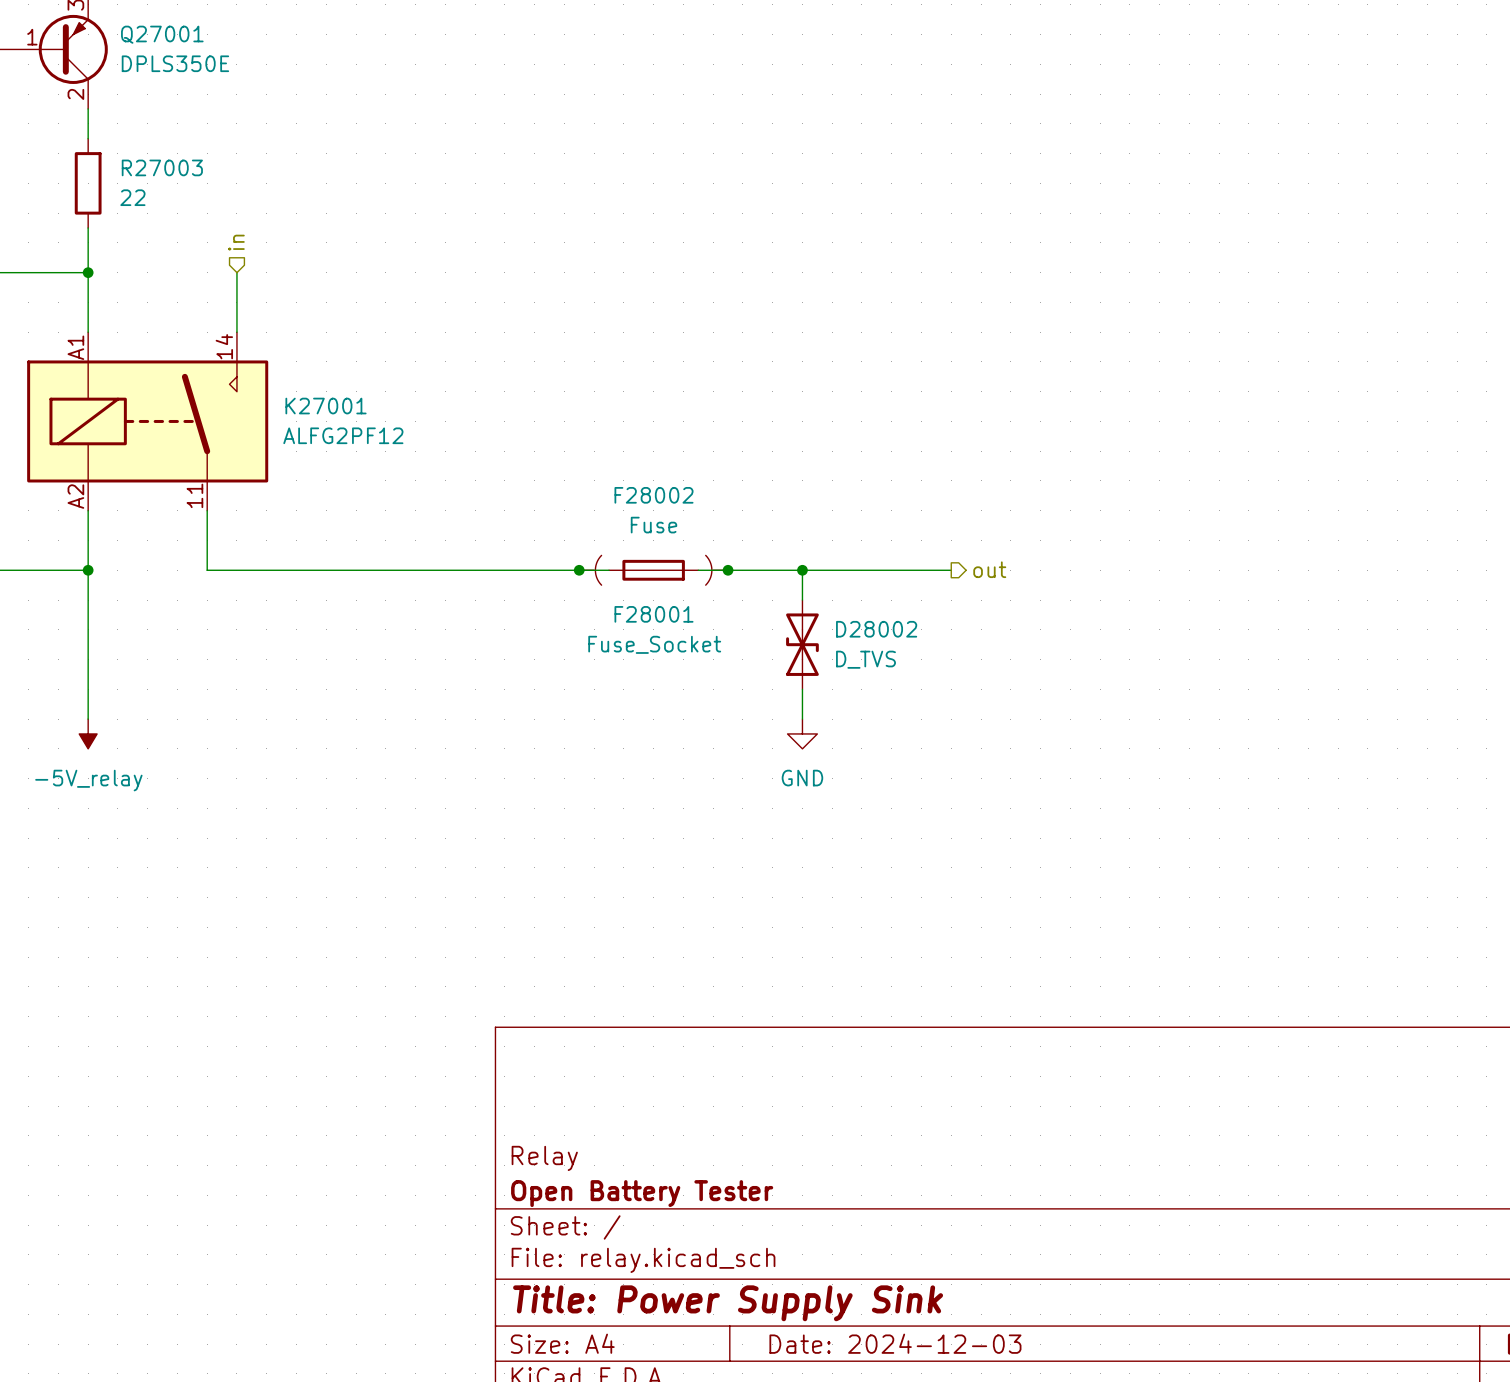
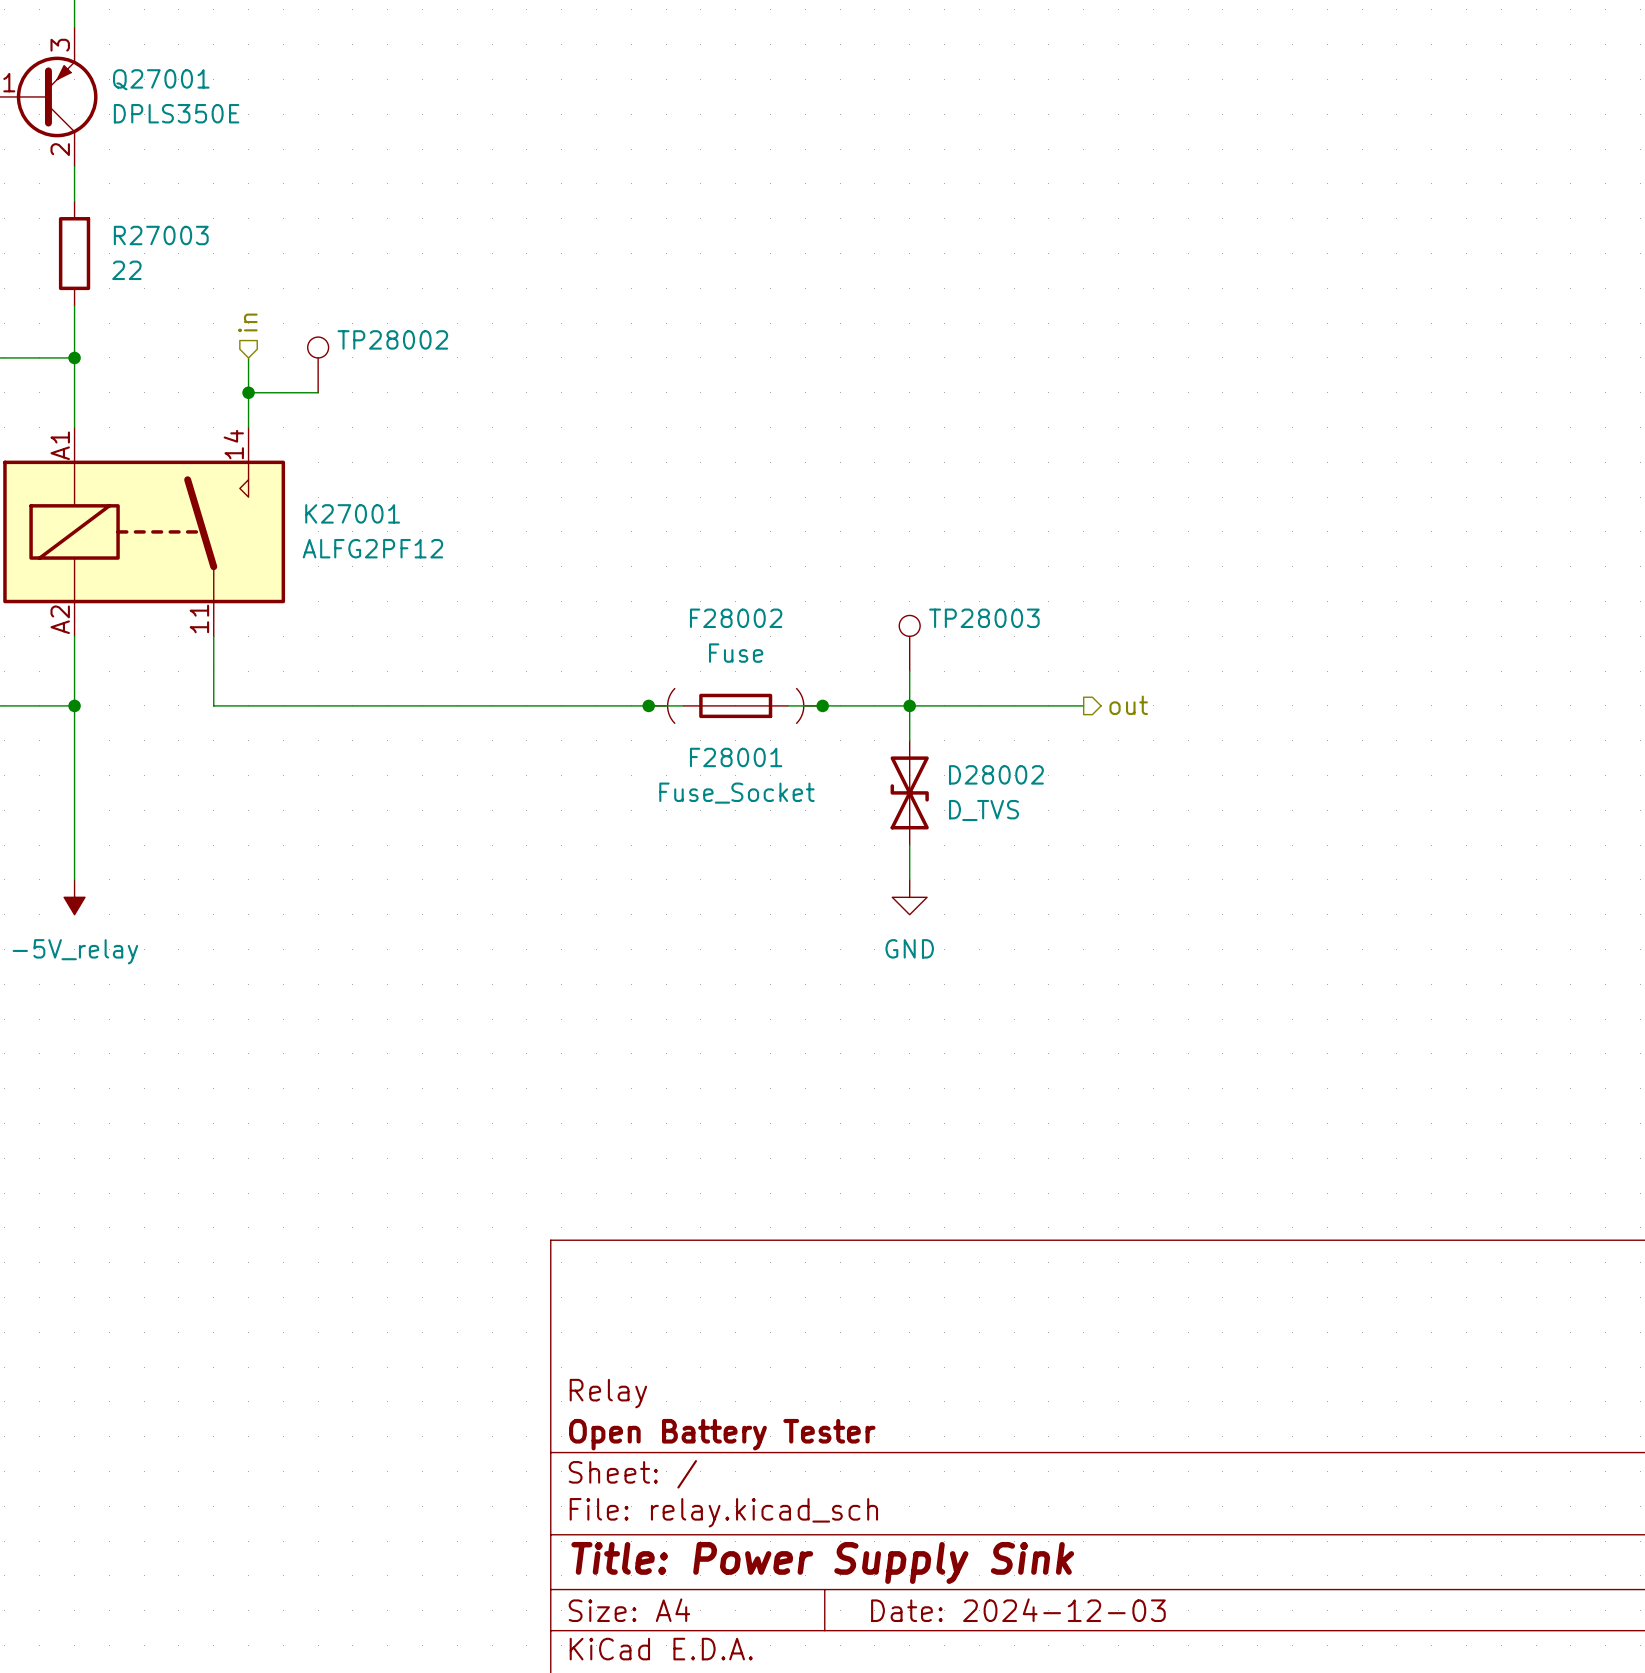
TP28002: none -> (318, 364)
wire: none -> (248, 392) (318, 392)
junction: none -> (248, 392)
TP28003: none -> (909, 643)
wire: none -> (909, 671) (909, 705)

